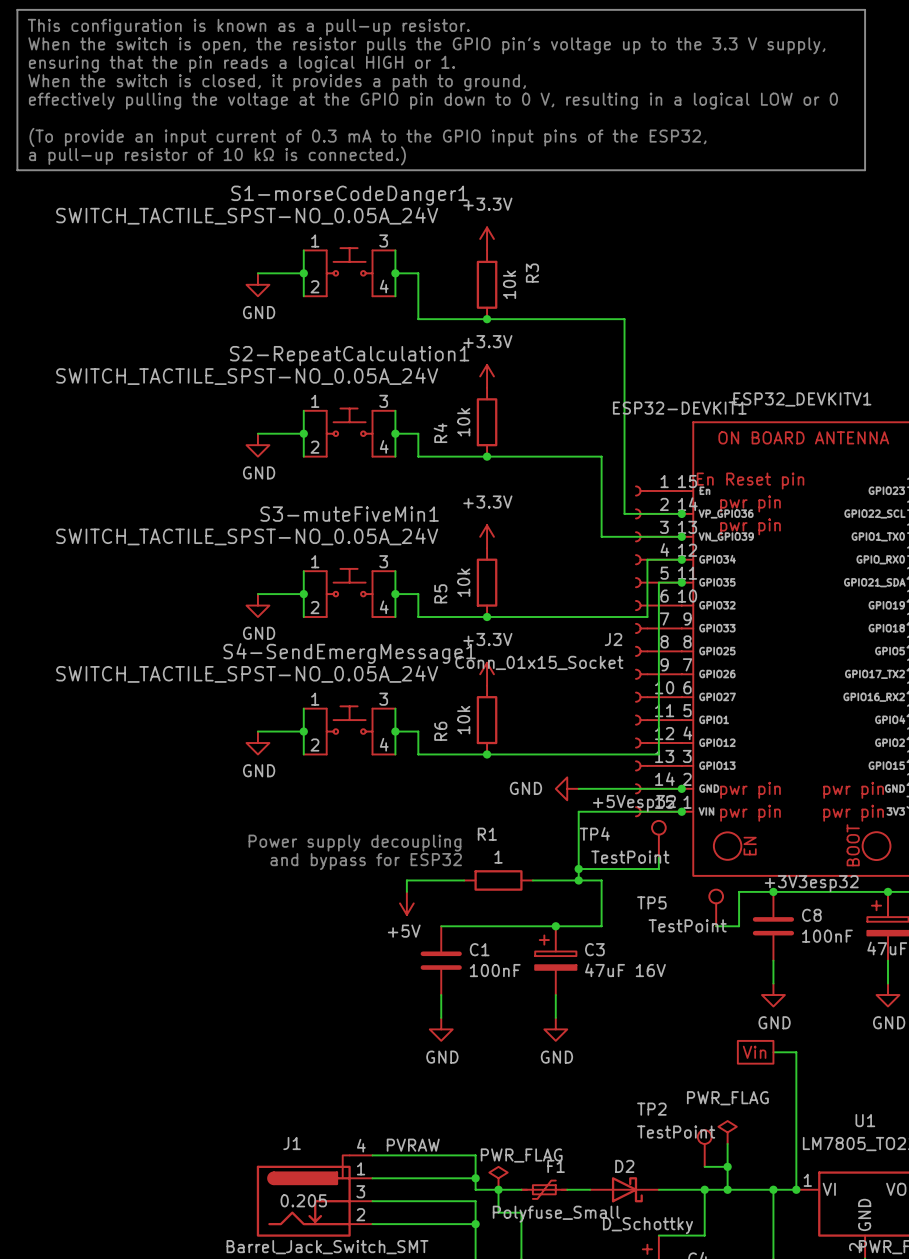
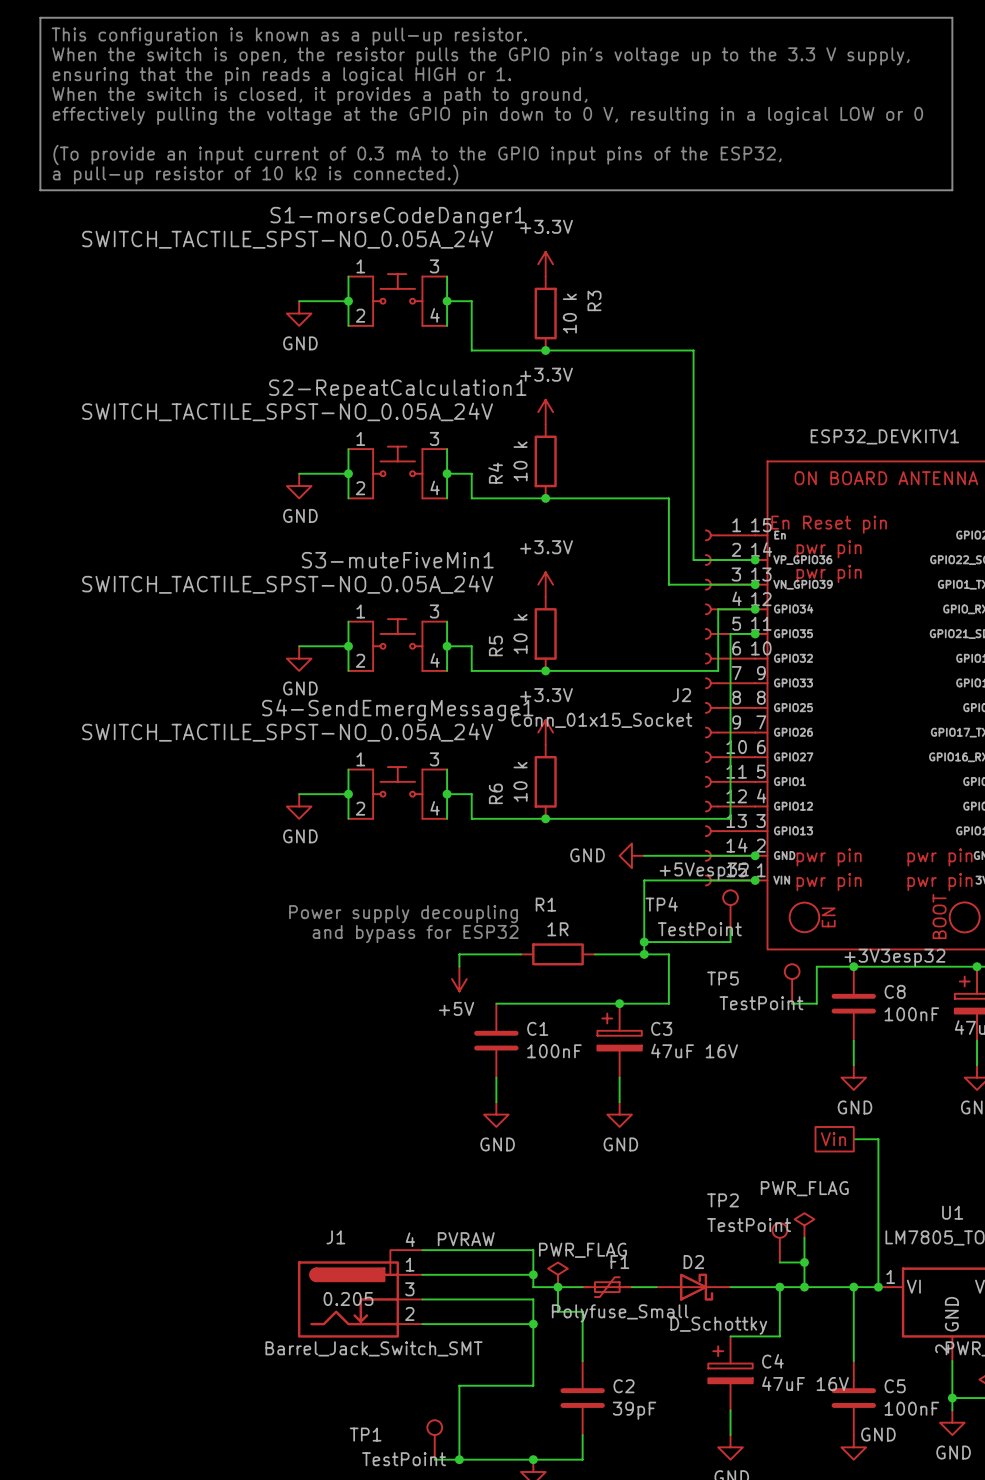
R3 value: 10k (509, 284) -> 10 k (569, 313)
ESP32_DEVKITV1 value: ESP32-DEVKIT1 (679, 408) -> none
R4 value: 10k (463, 422) -> 10 k (520, 461)
R5 value: 10k (463, 582) -> 10 k (520, 633)
R6 value: 10k (463, 720) -> 10 k (520, 781)
R1 value: 1 (498, 857) -> 1R (557, 929)

